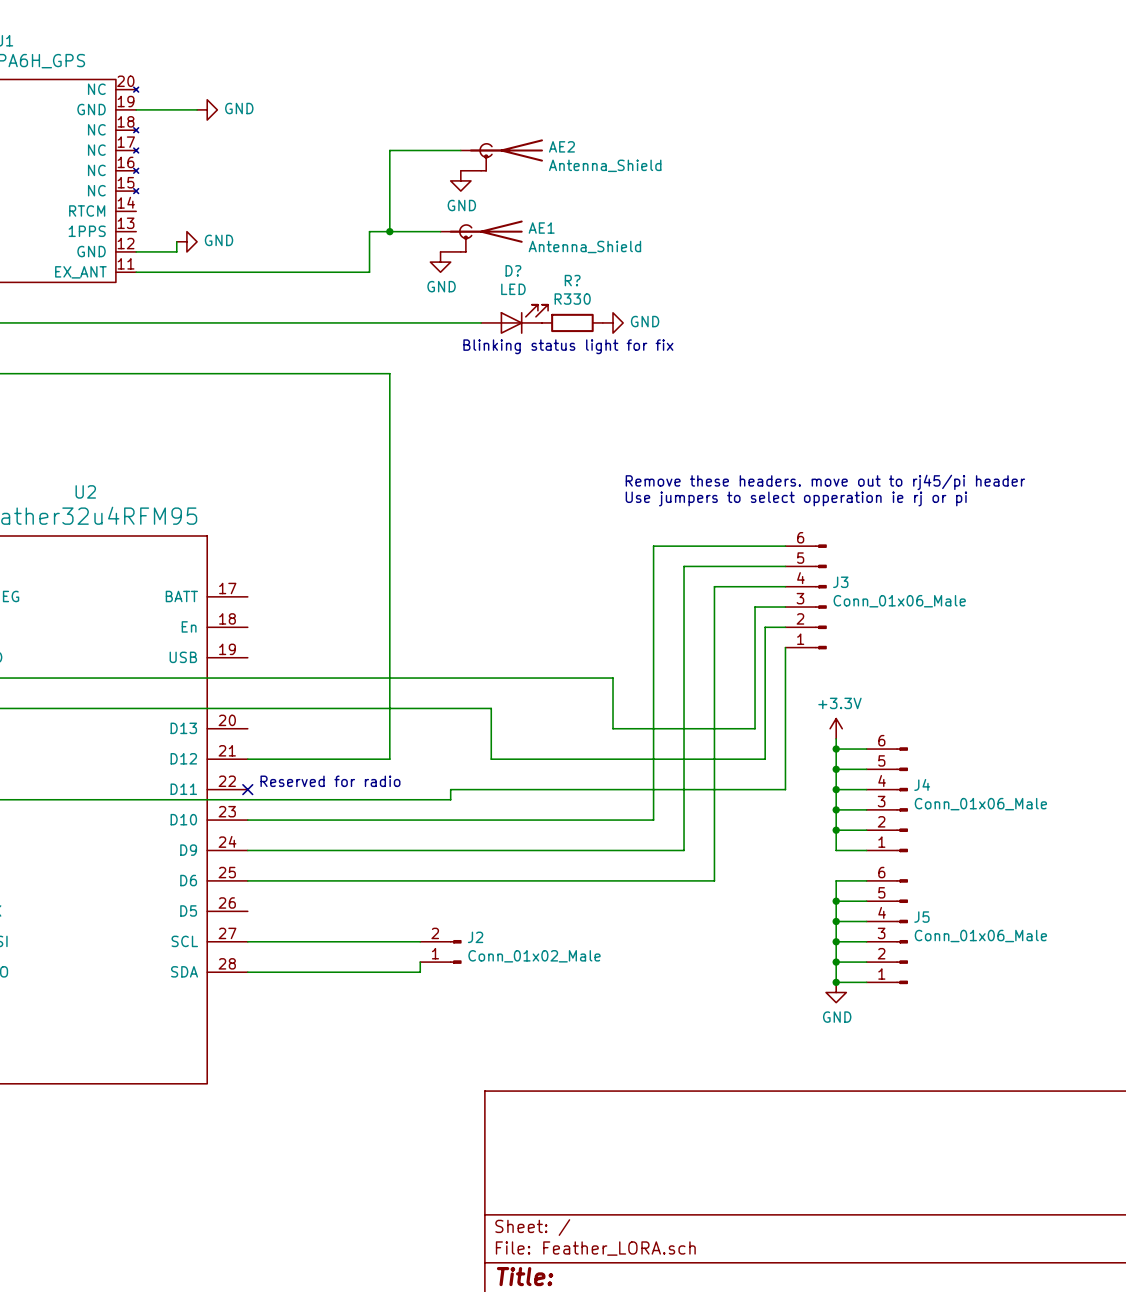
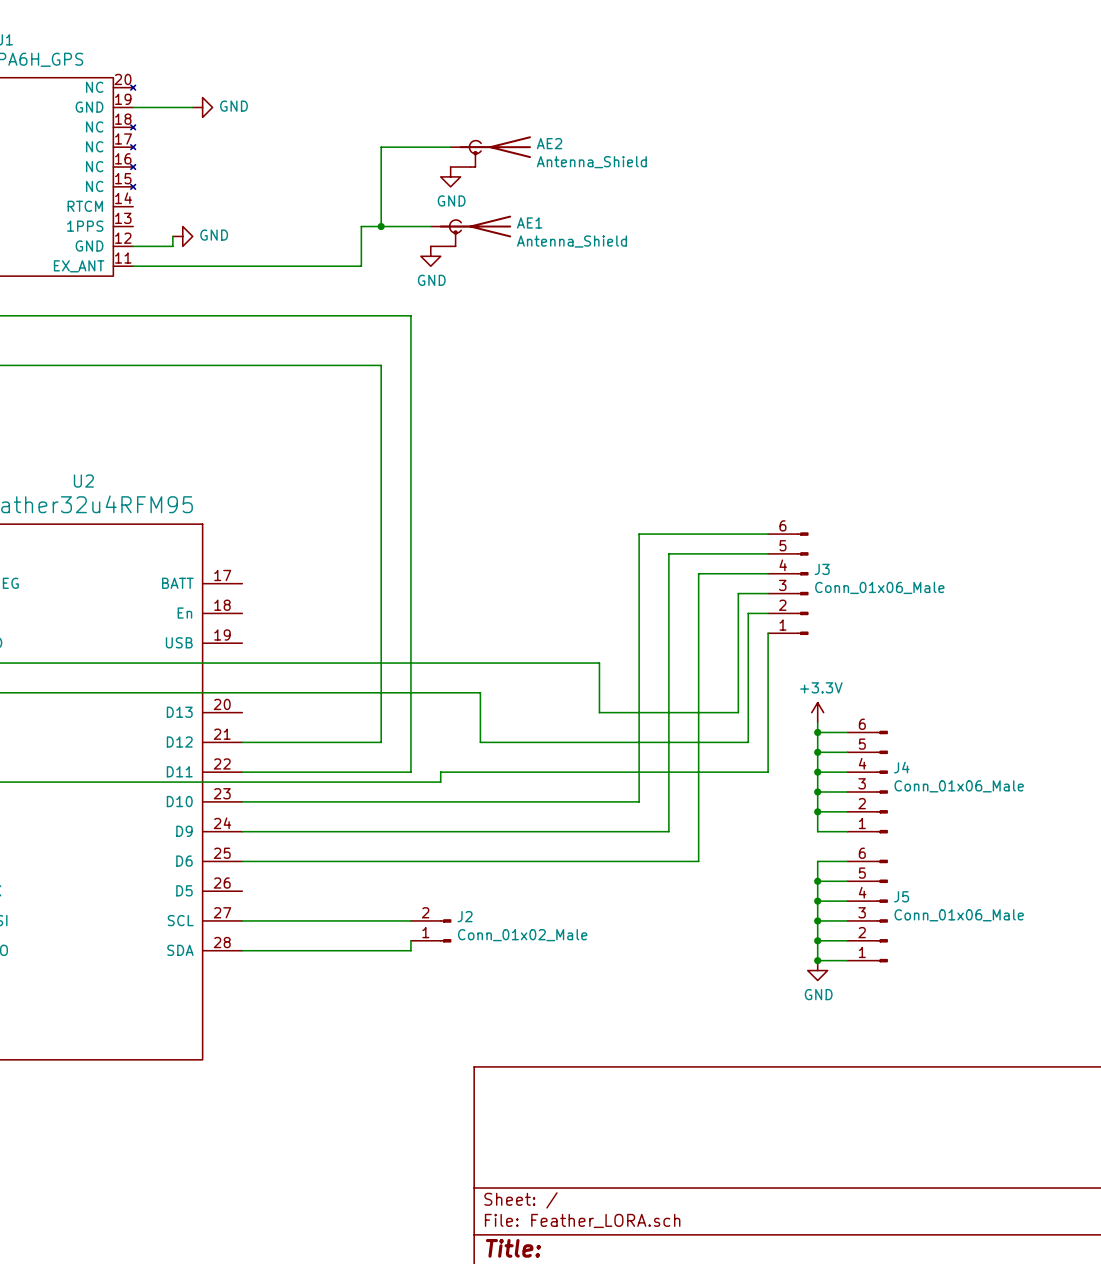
D?: LED (514, 319) -> none
wire: (420, 322) (481, 322) -> (410, 315) (410, 772) (242, 772)
R?: R330 (572, 322) -> none
power symbol: GND (613, 322) -> none
text: Blinking status light for fix (568, 346) -> none
text: Remove these headers. move out to rj45/pi header (825, 482) -> none
text: Use jumpers to select opperation ie rj or pi (796, 498) -> none
text: Reserved for radio (330, 781) -> none
no-connect mark: (247, 789) -> none

